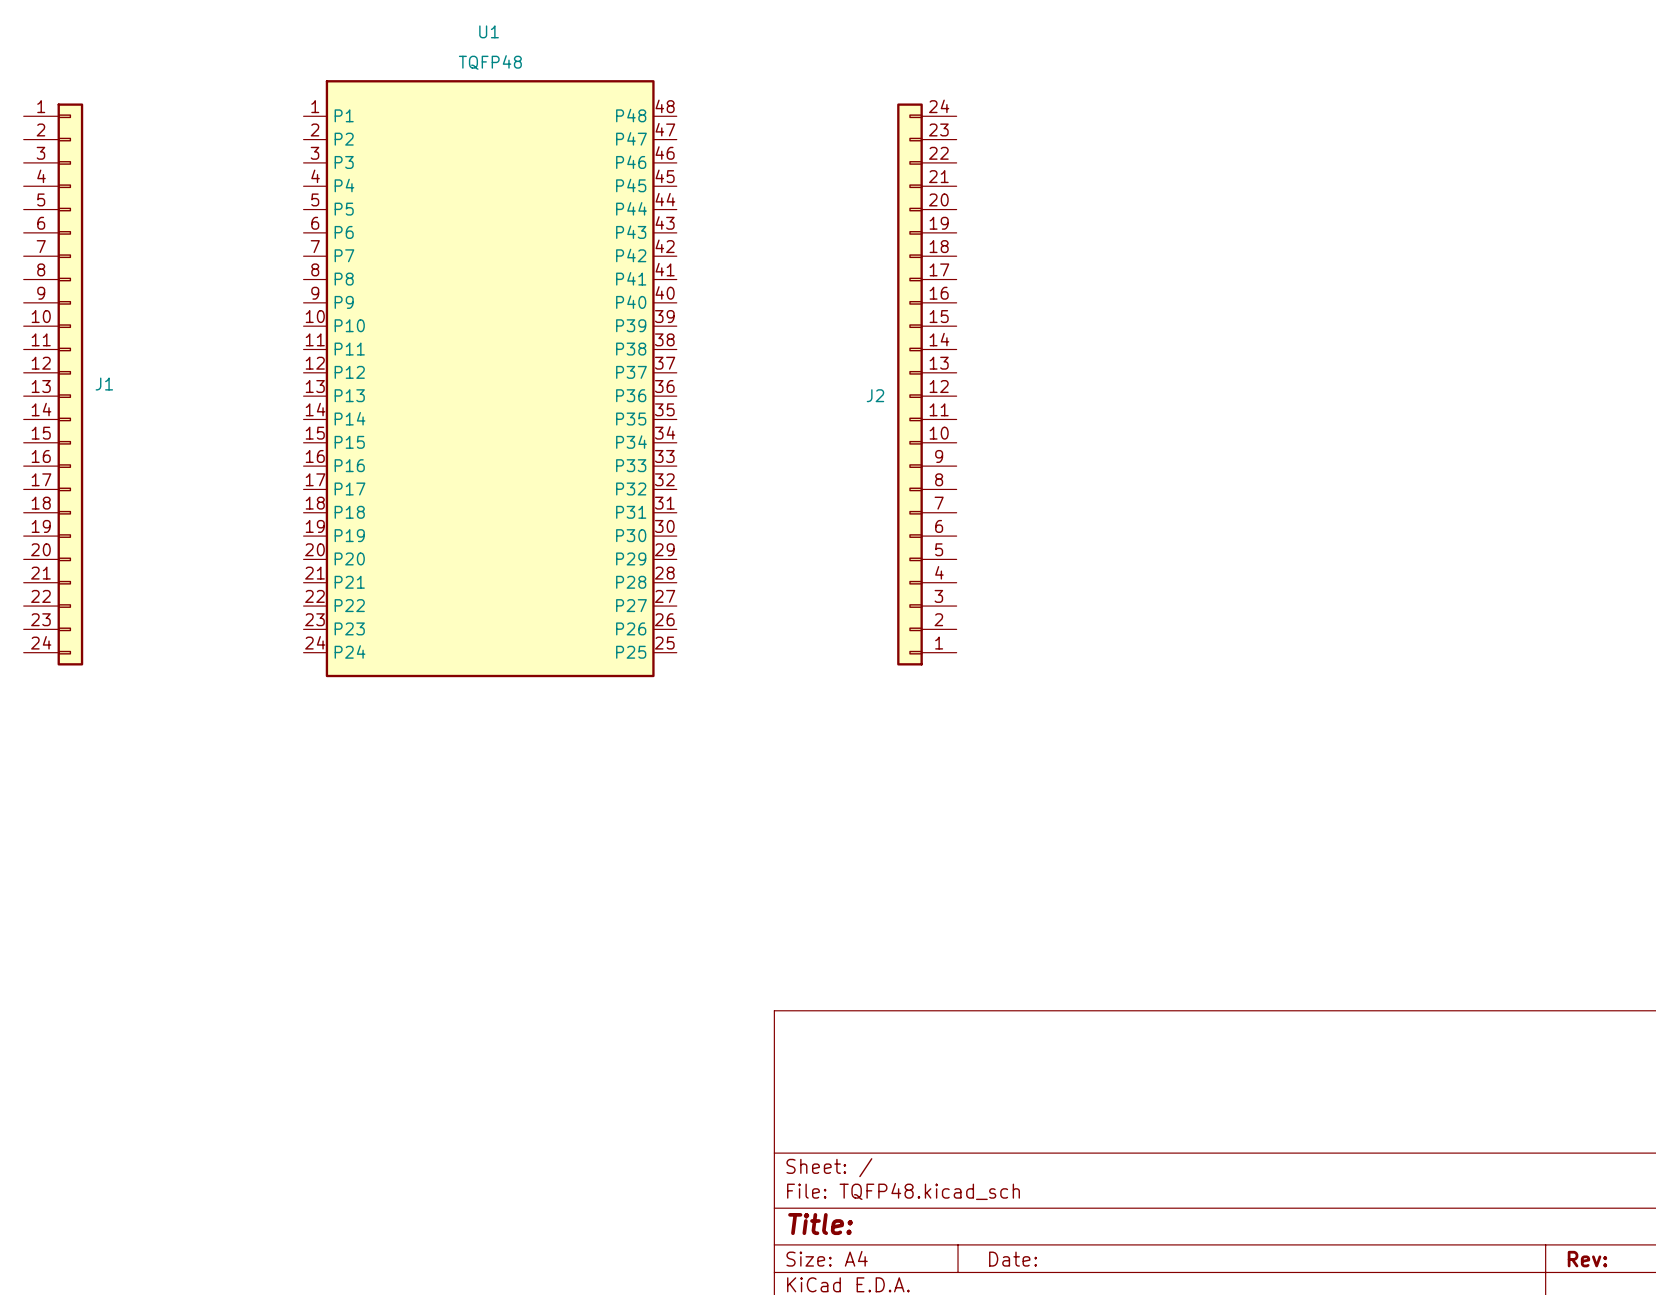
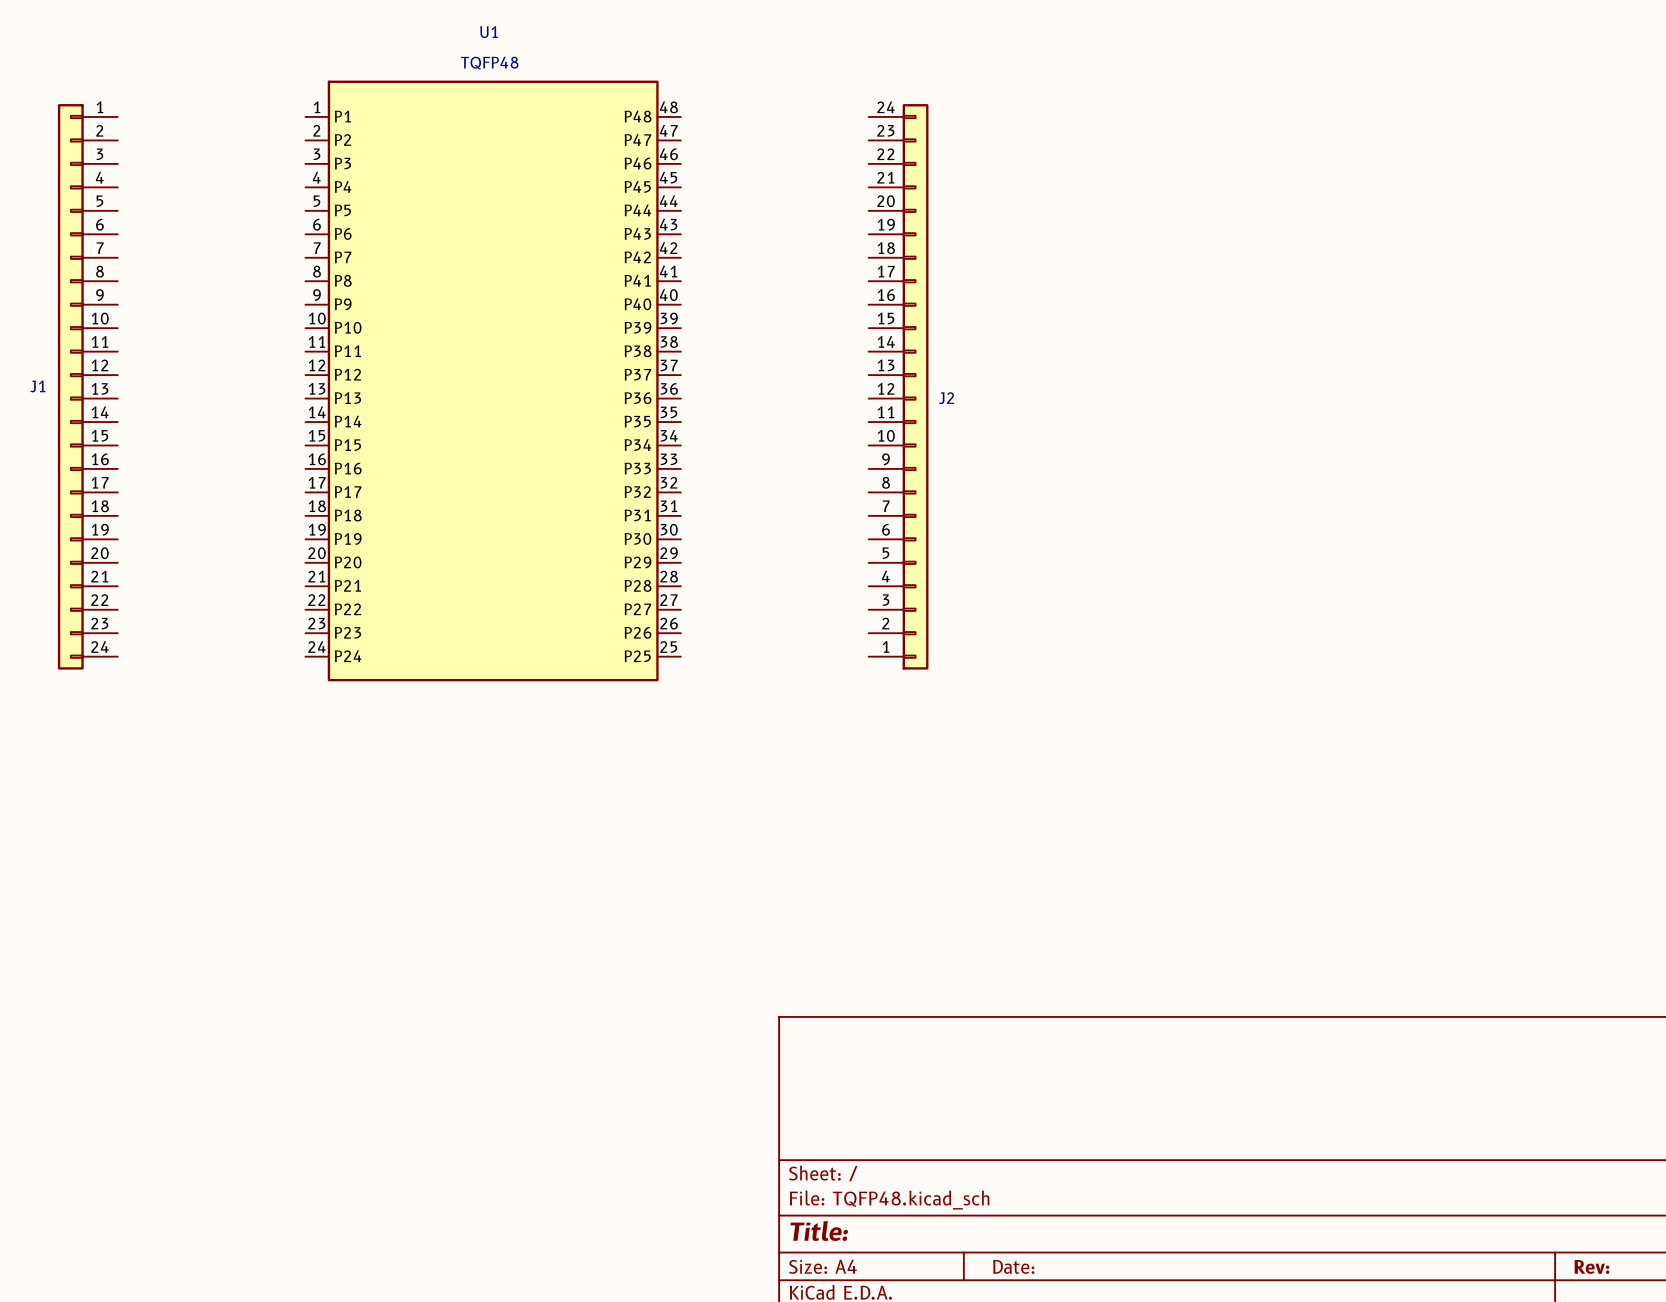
J1 flip: as is (70, 384) -> left-right (70, 386)
J2 flip: as is (909, 384) -> left-right (915, 386)

